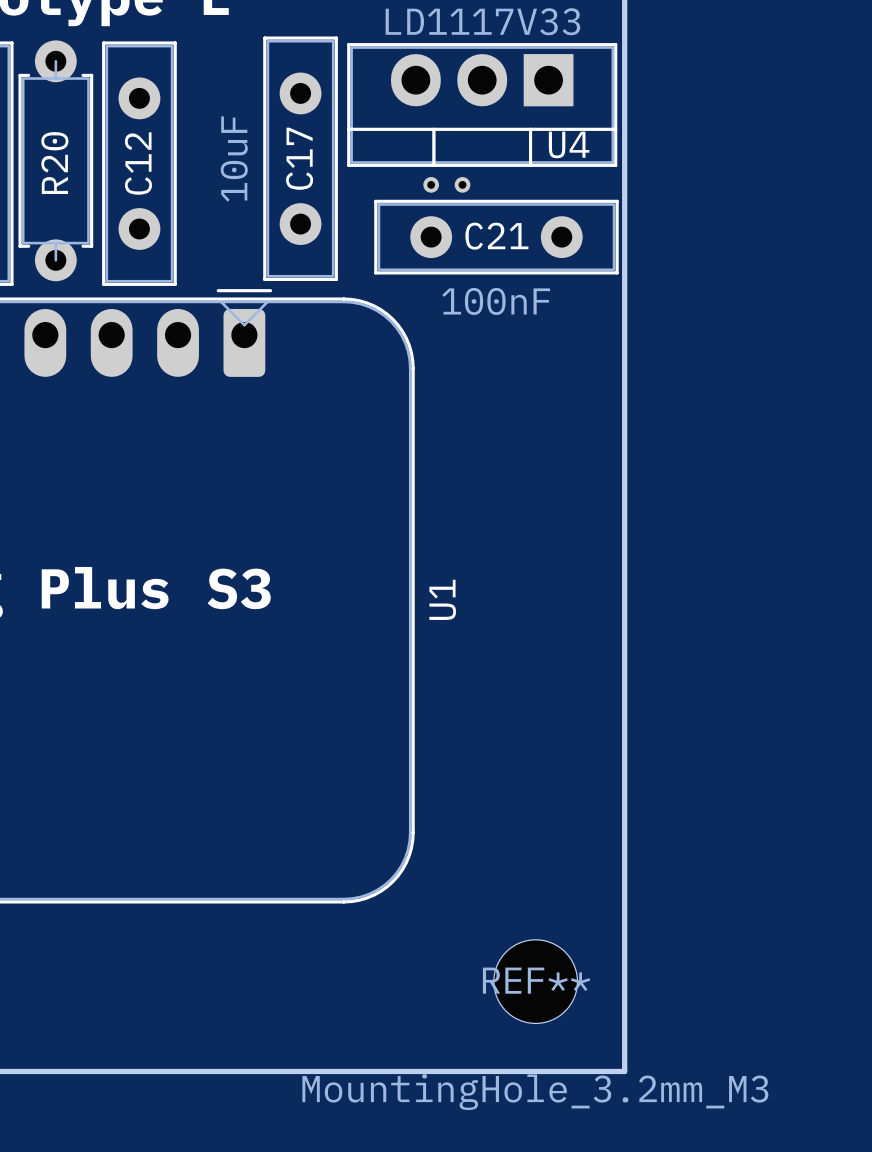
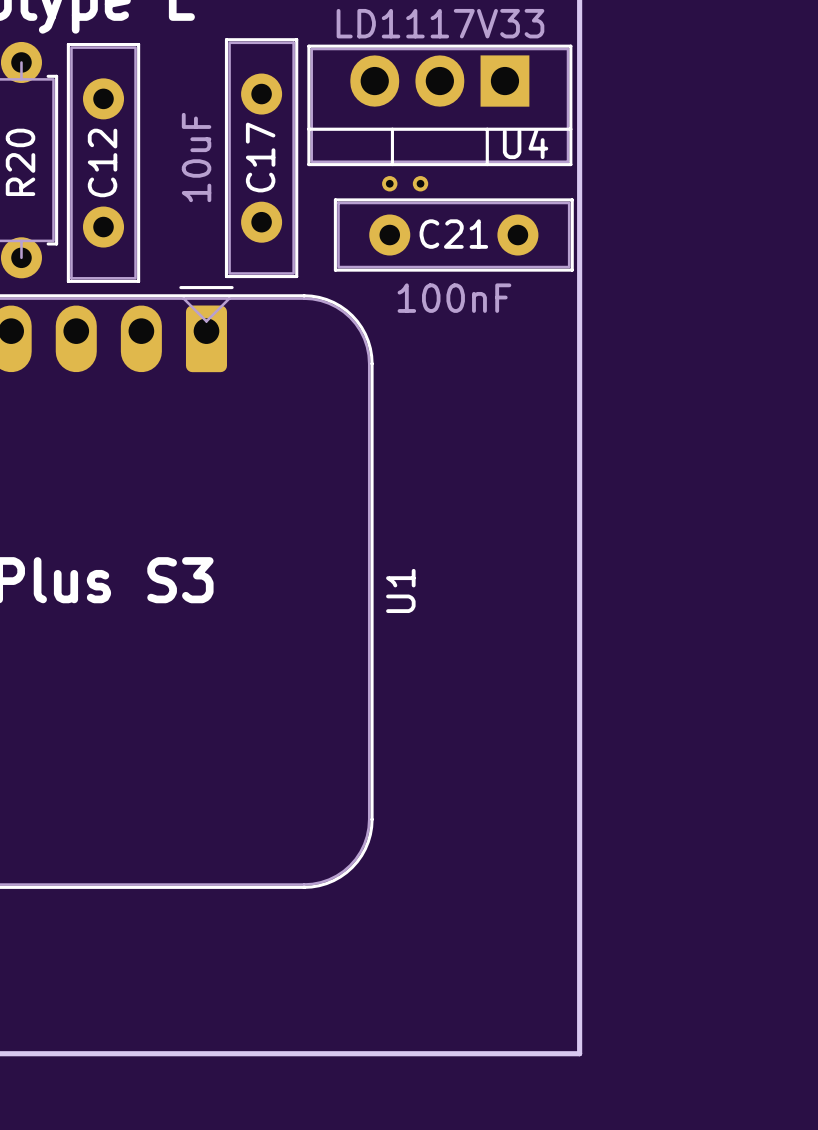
REF**: MountingHole_3.2mm_M3 (535, 981) -> none

